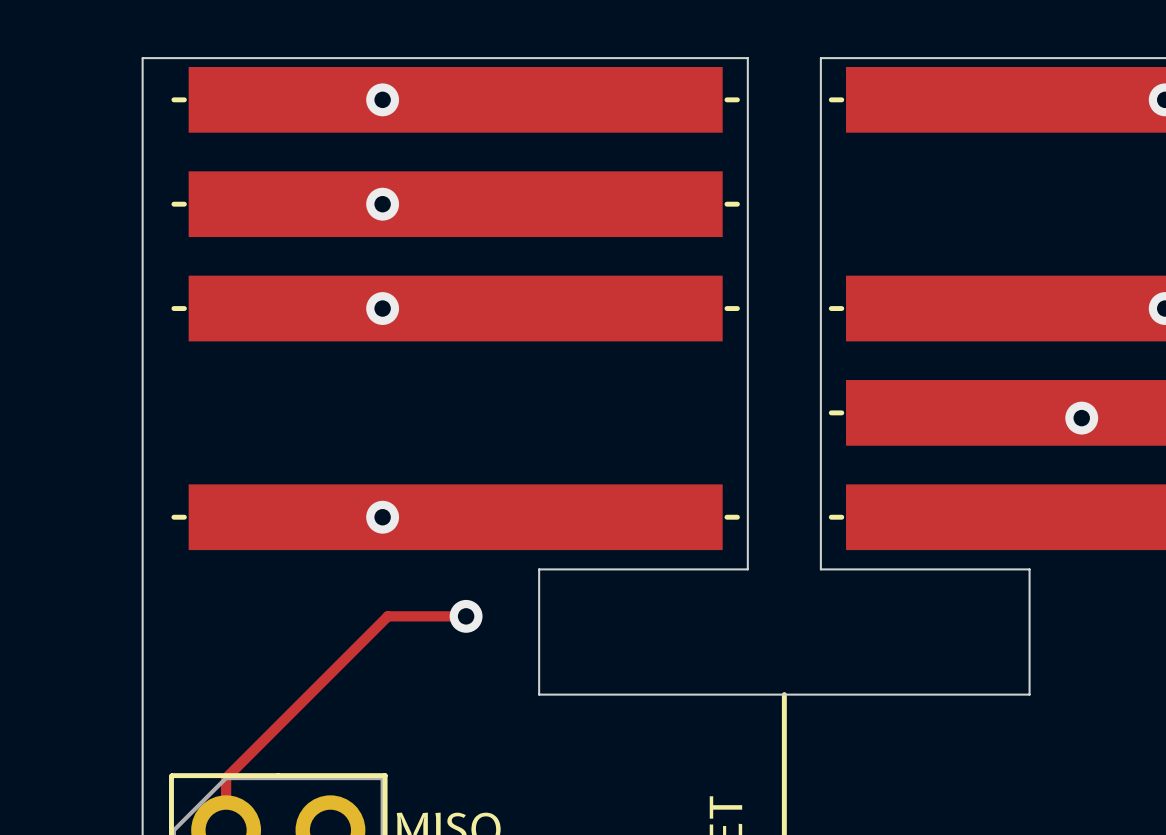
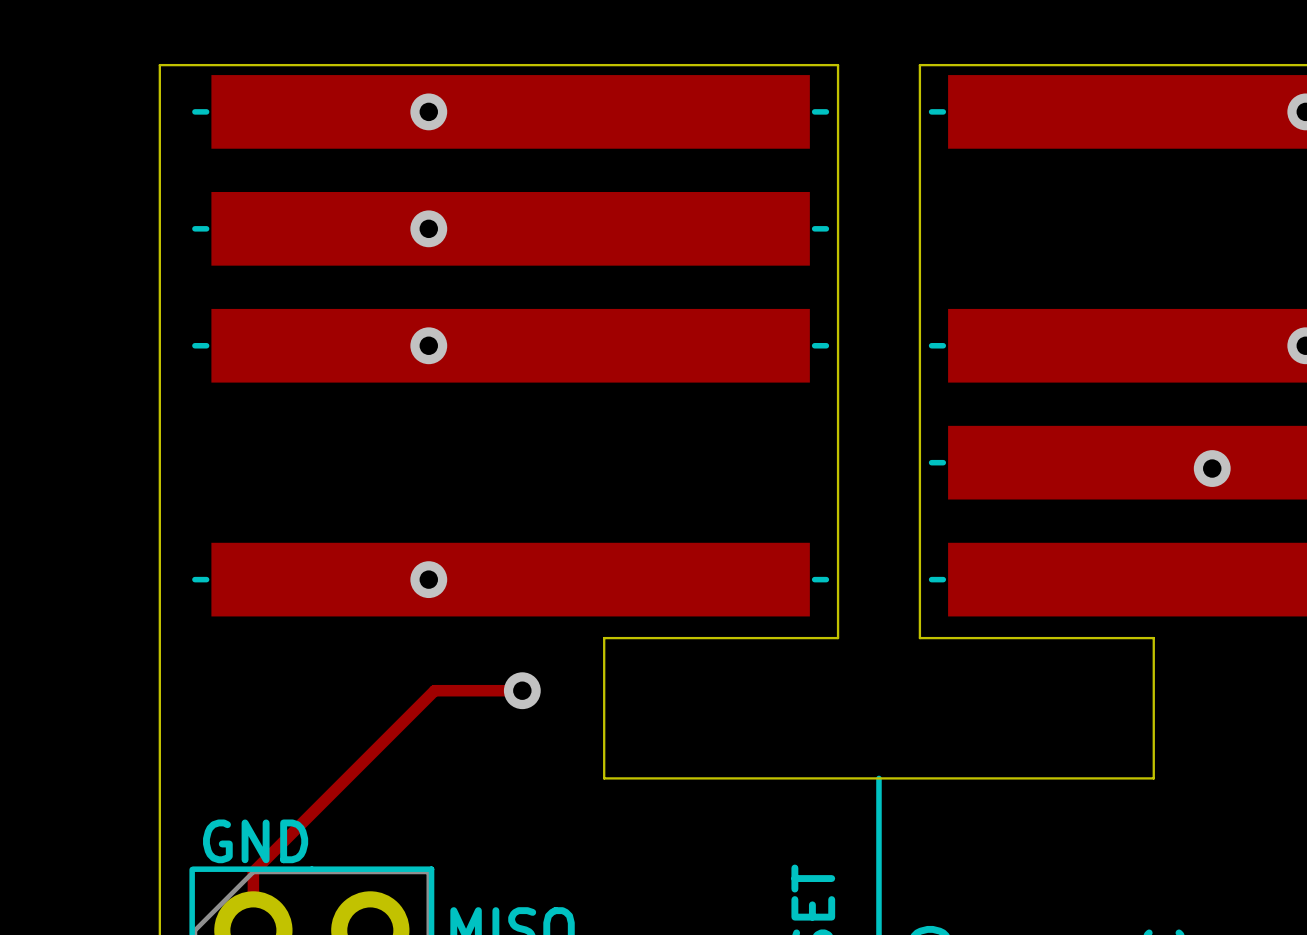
text: none -> GND (255, 841)

